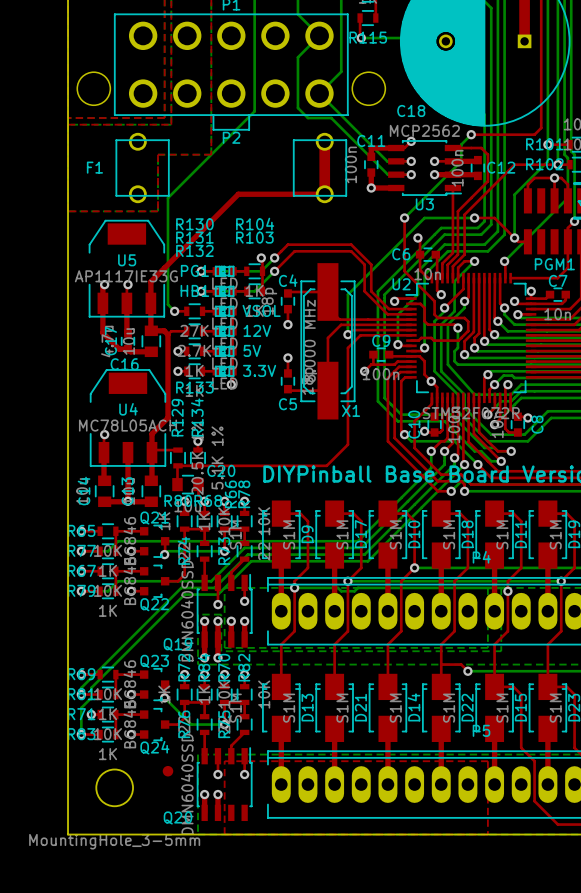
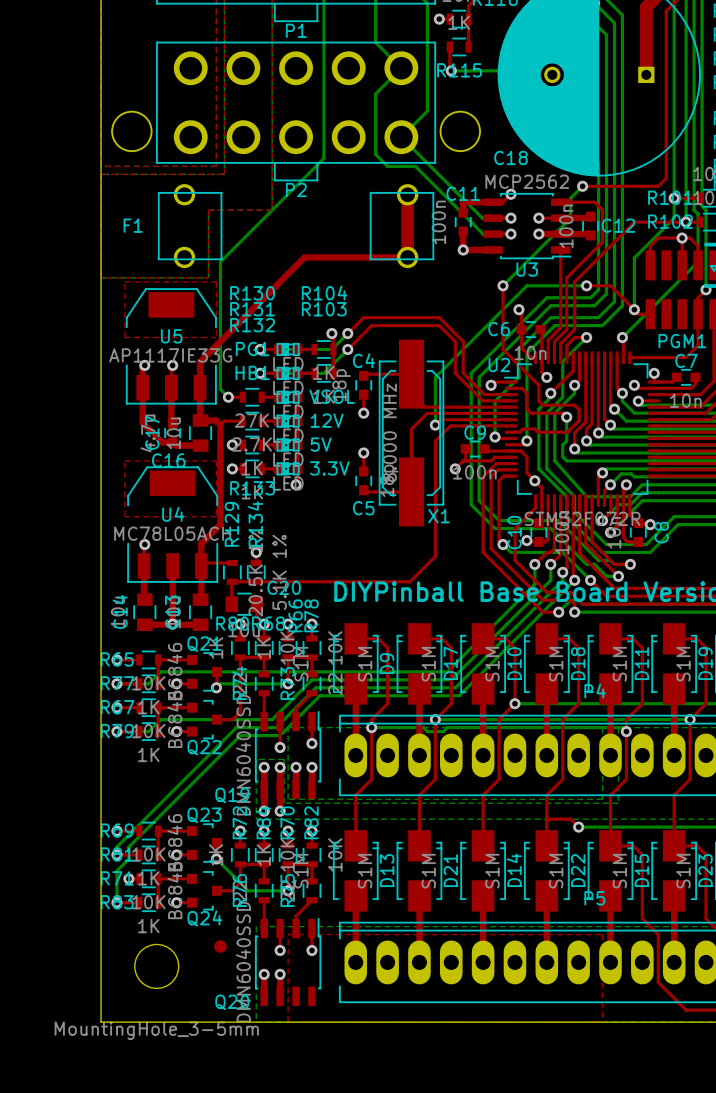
top zone outline: none -> (124, 281) (216, 281) (216, 337) (124, 337) (124, 281)
top zone outline: none -> (124, 460) (124, 516) (216, 516) (216, 460) (124, 460)

